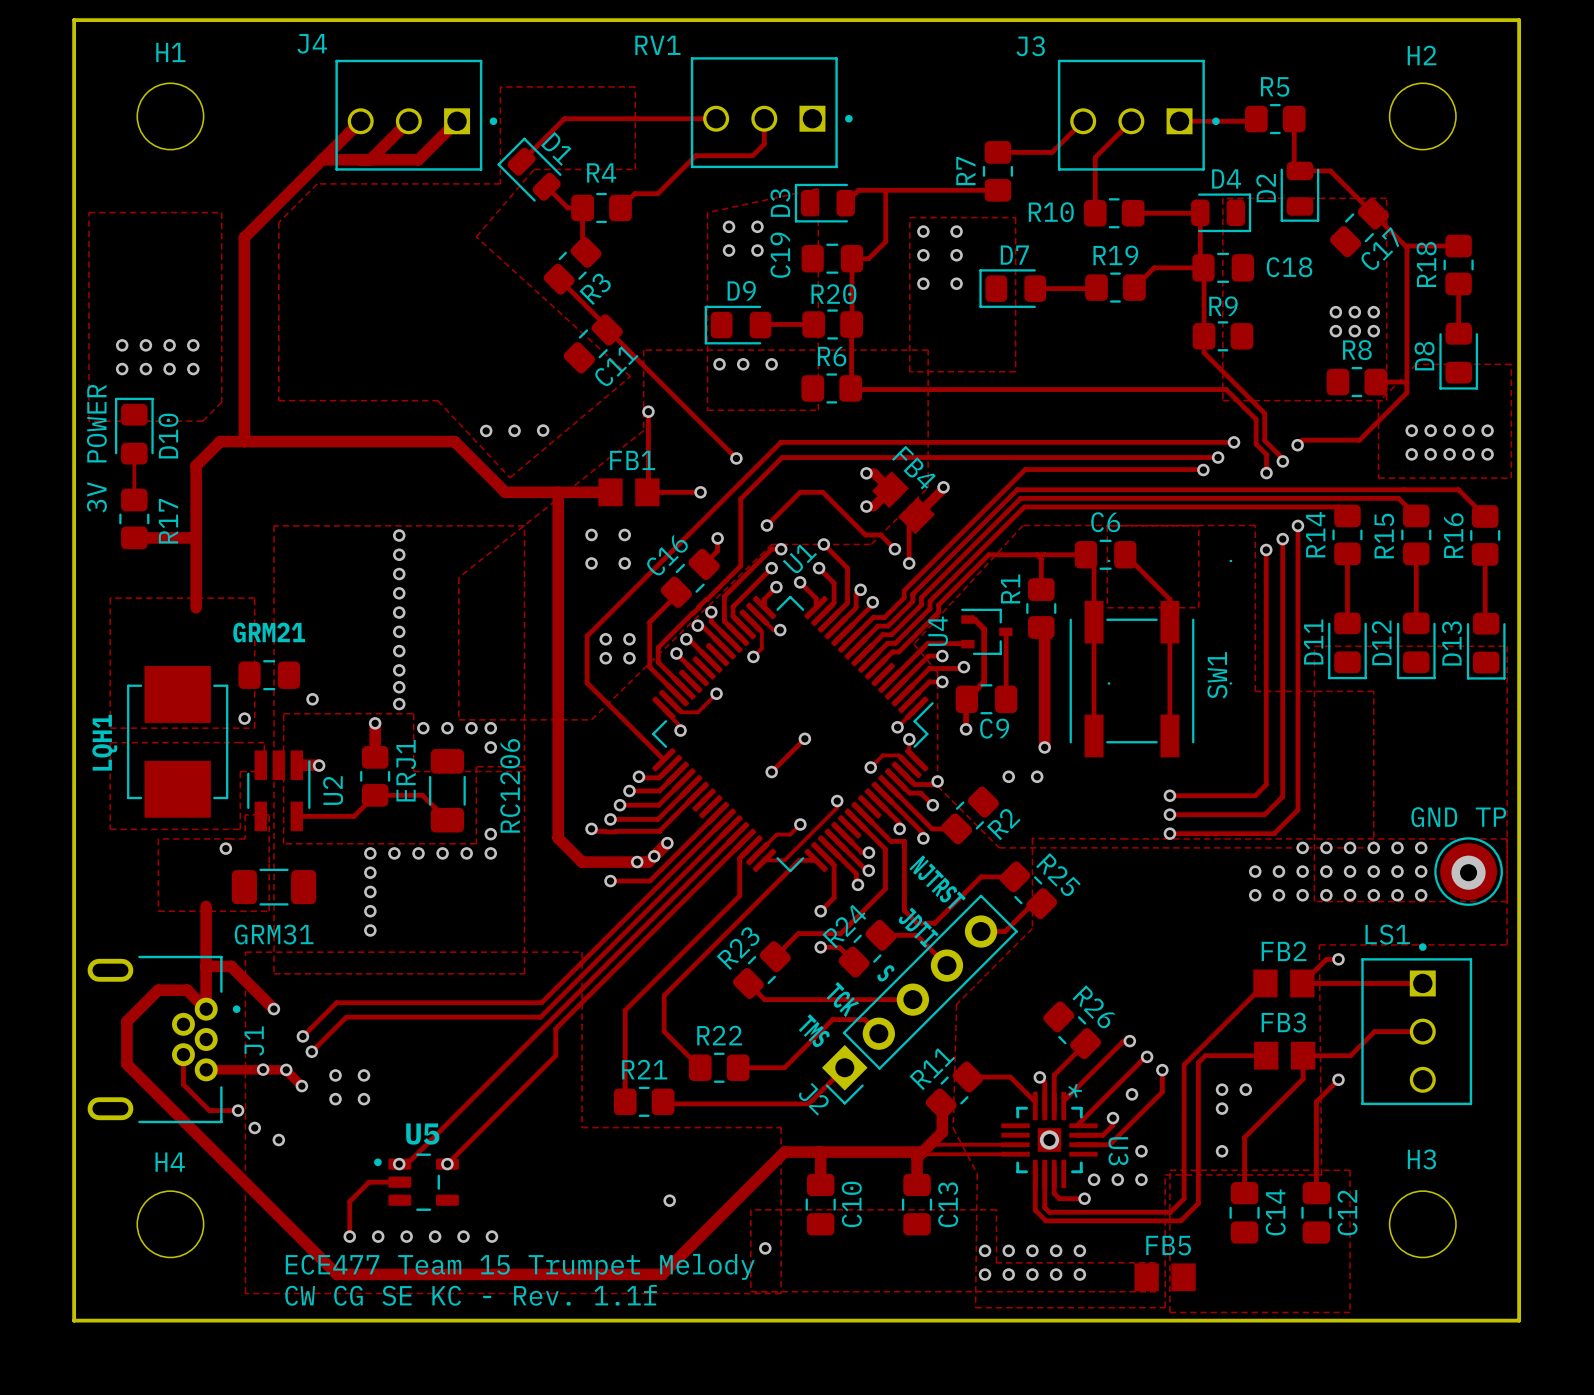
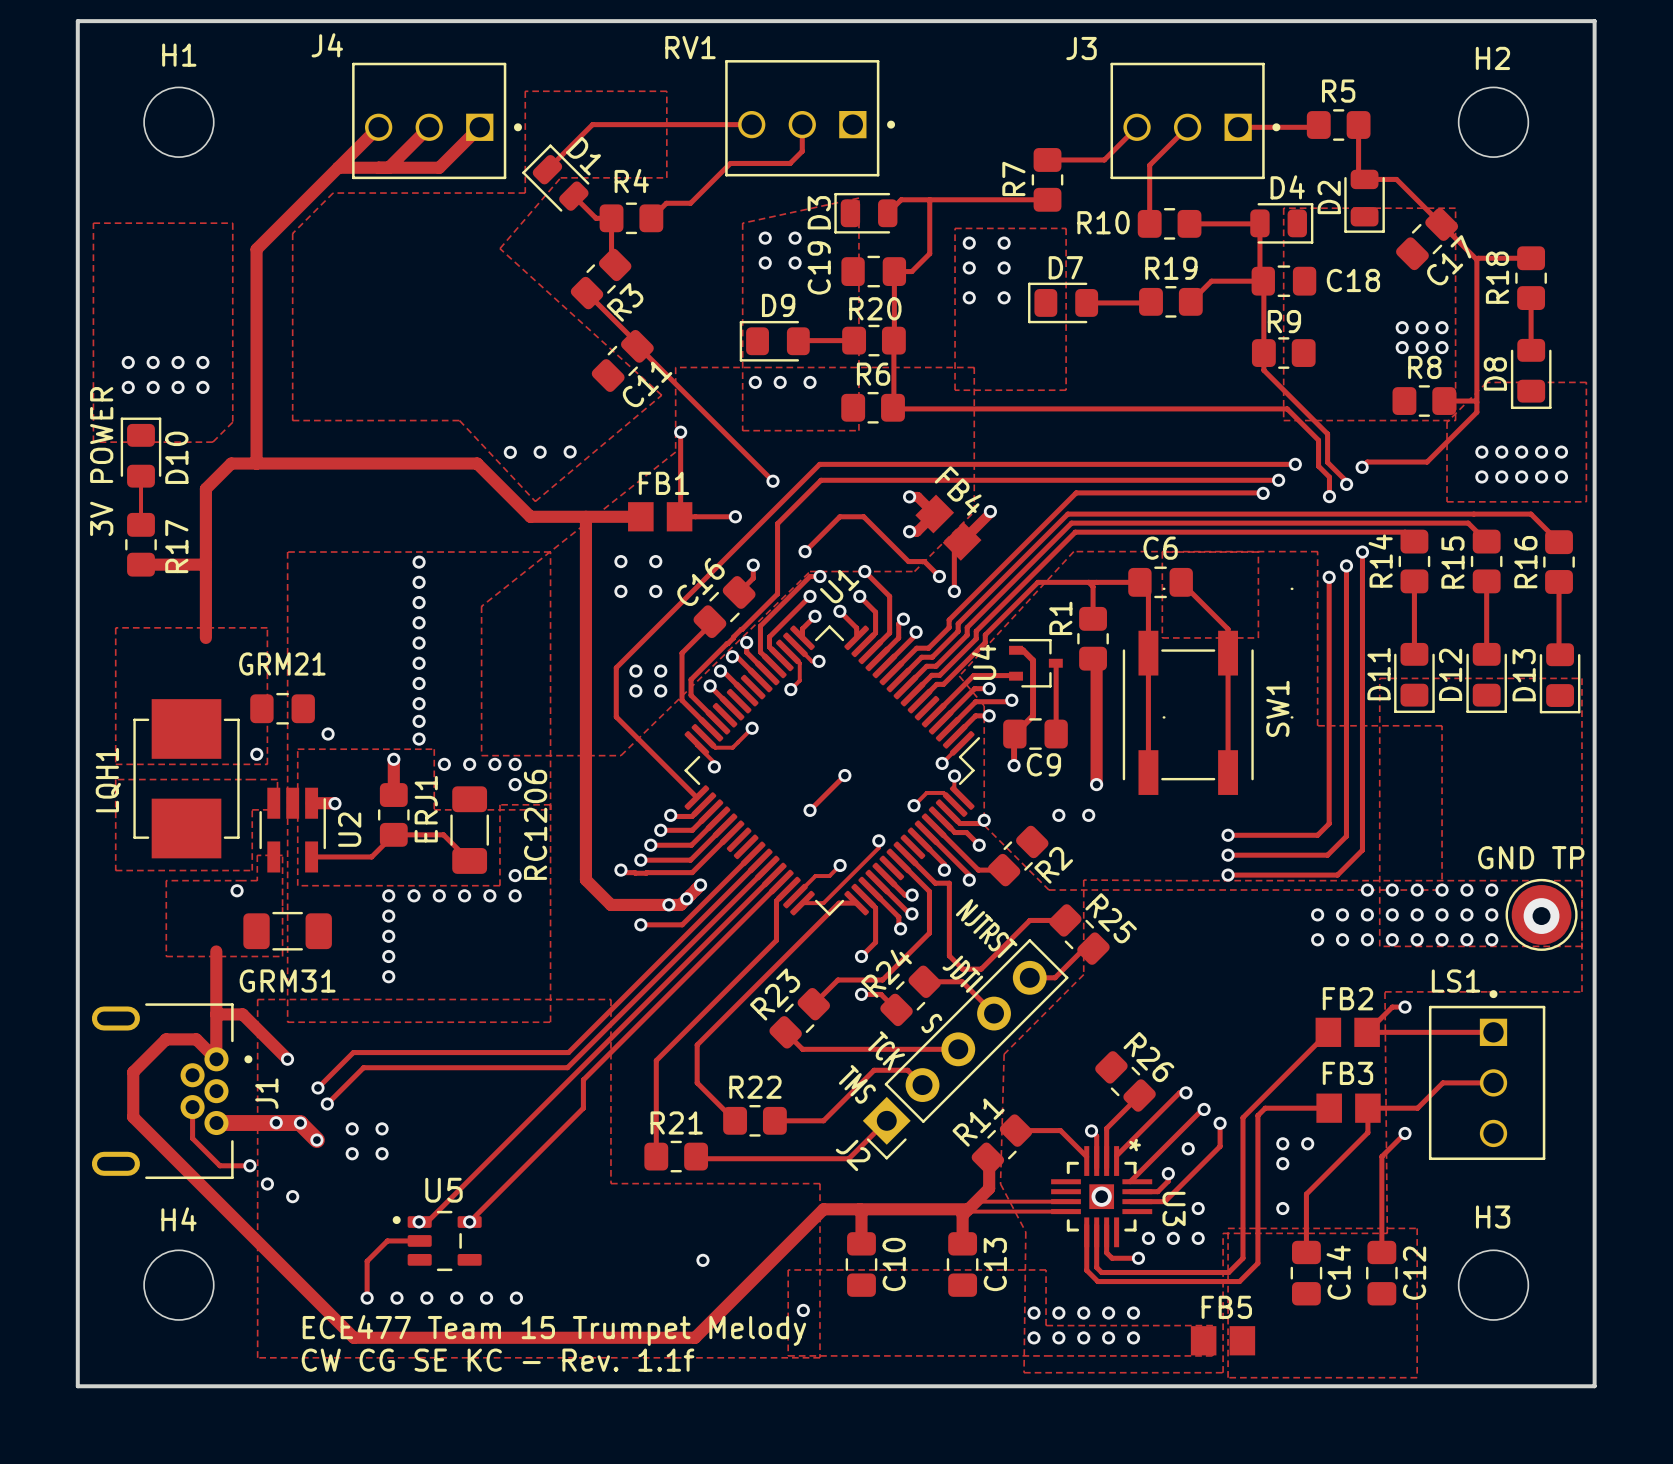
track width: thin (206, 1069) (286, 1069) -> thick (216, 1123) (300, 1123)
track width: thin (286, 1070) (301, 1086) -> thick (300, 1123) (316, 1140)

